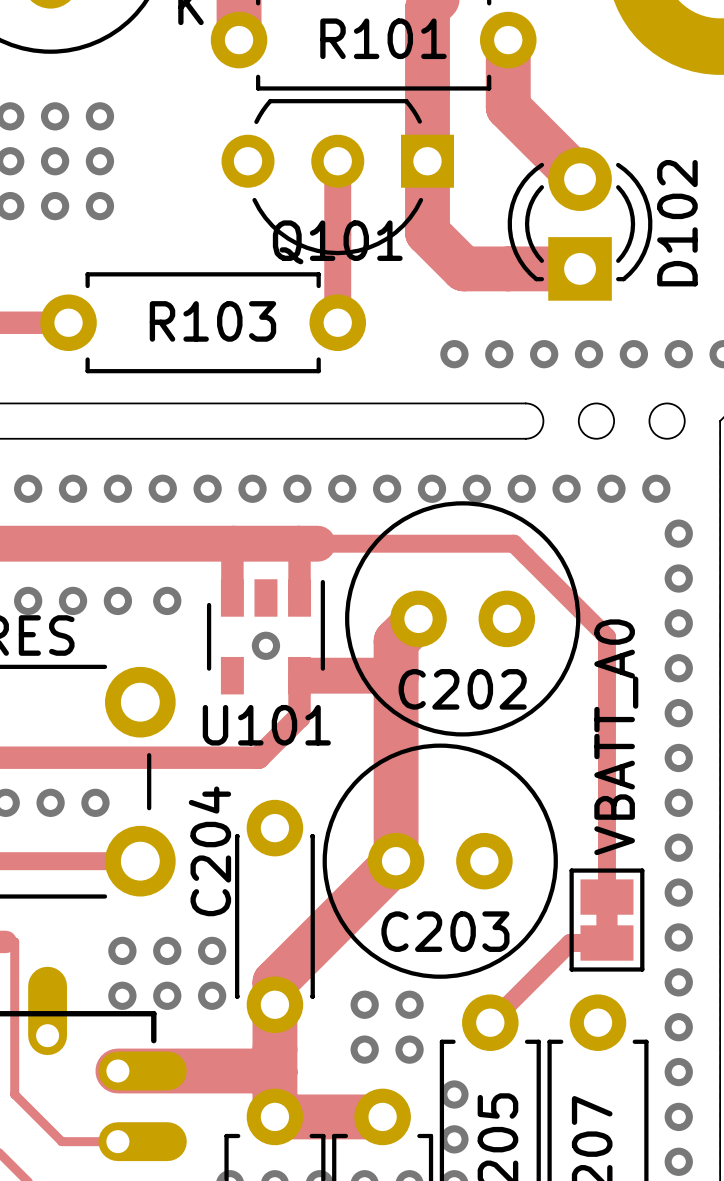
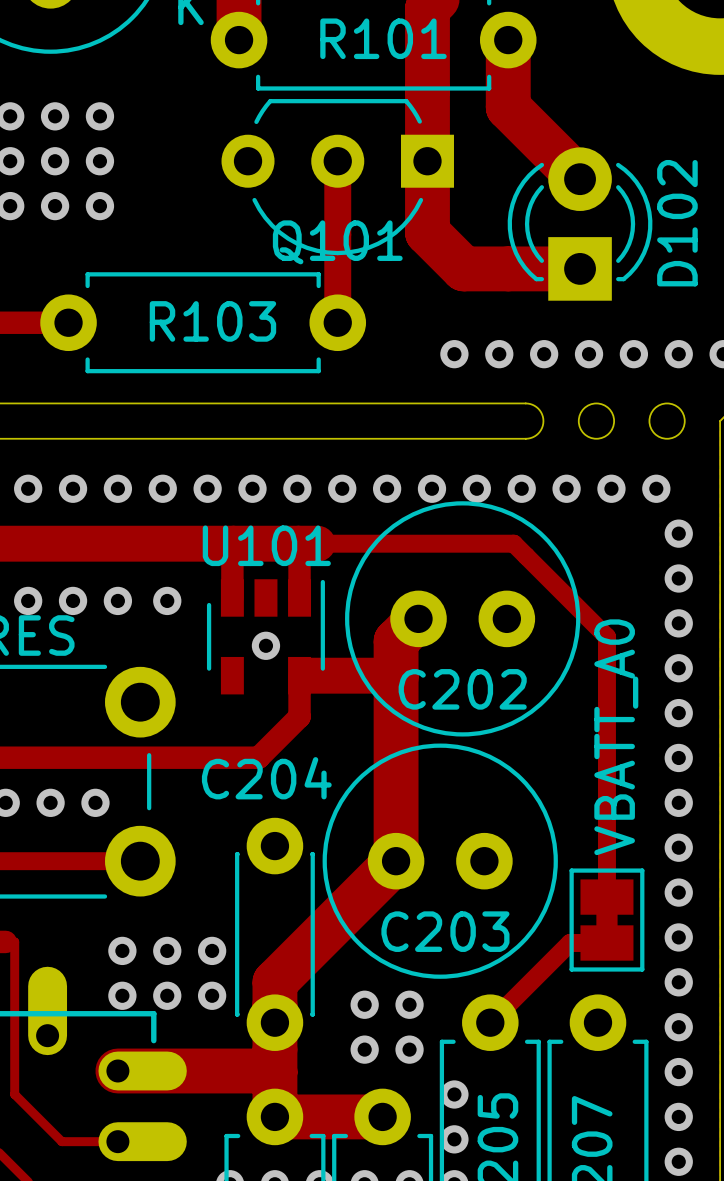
U101 name position: U101 (266, 725) -> U101 (266, 545)
C204 name rotation: 0° (209, 851) -> 90° clockwise (266, 778)
C204 position: (274, 916) -> (274, 934)

